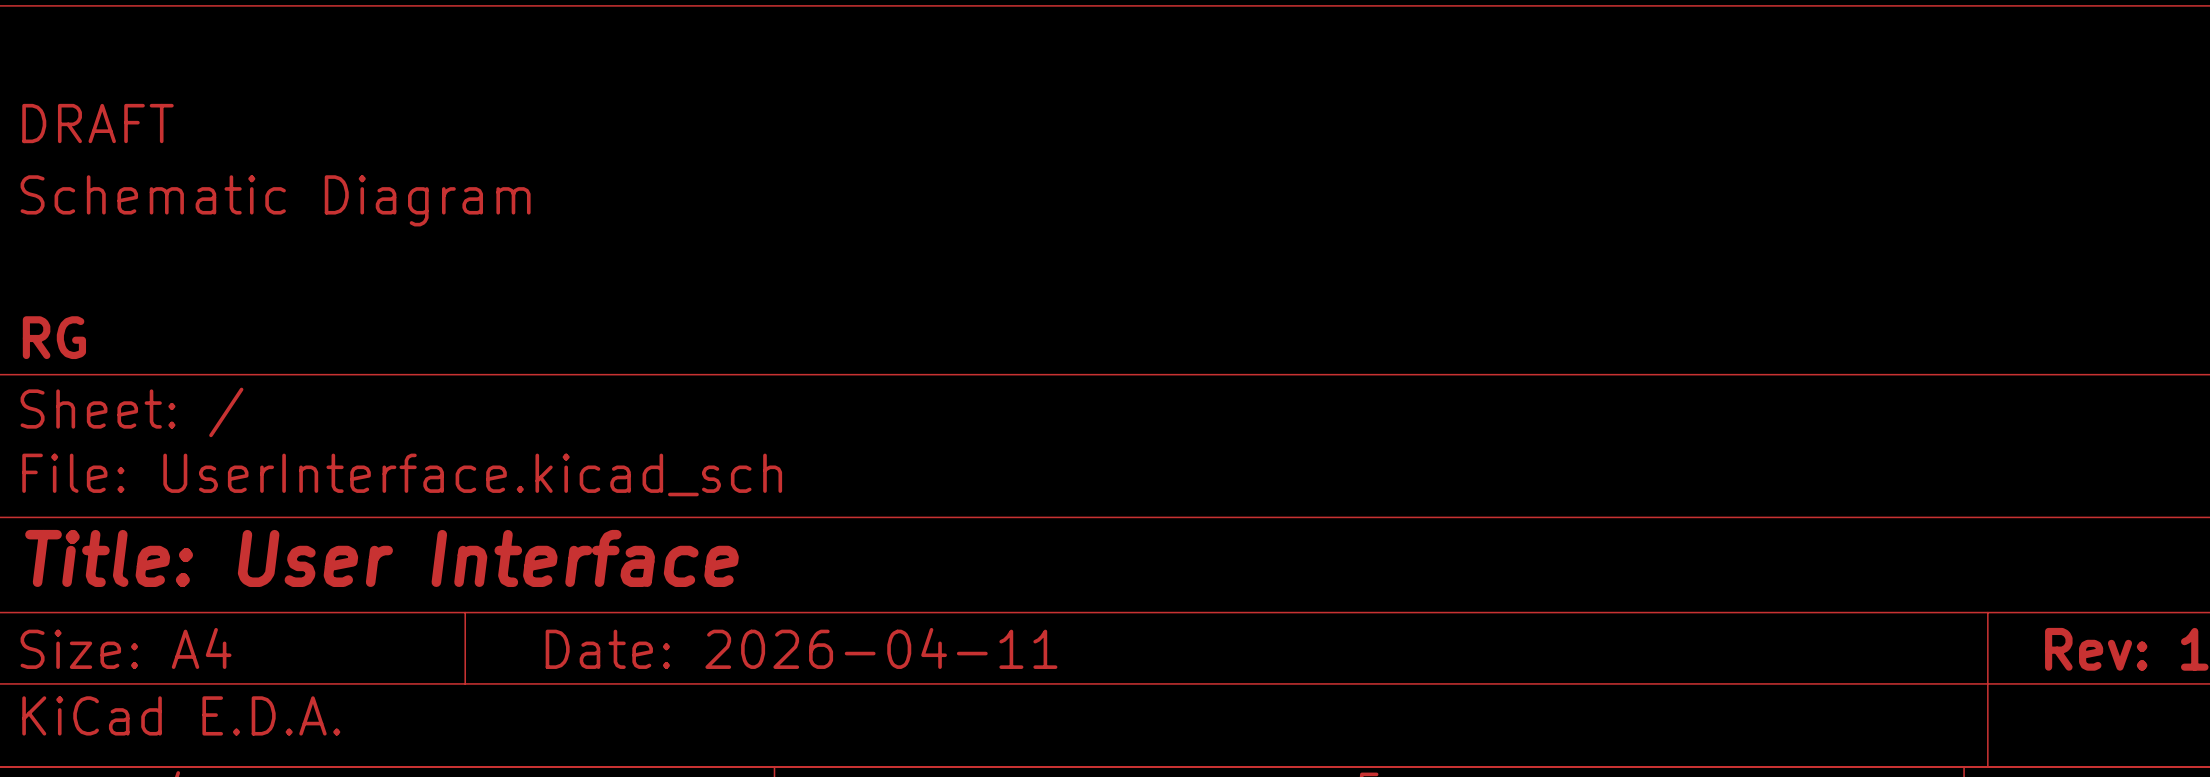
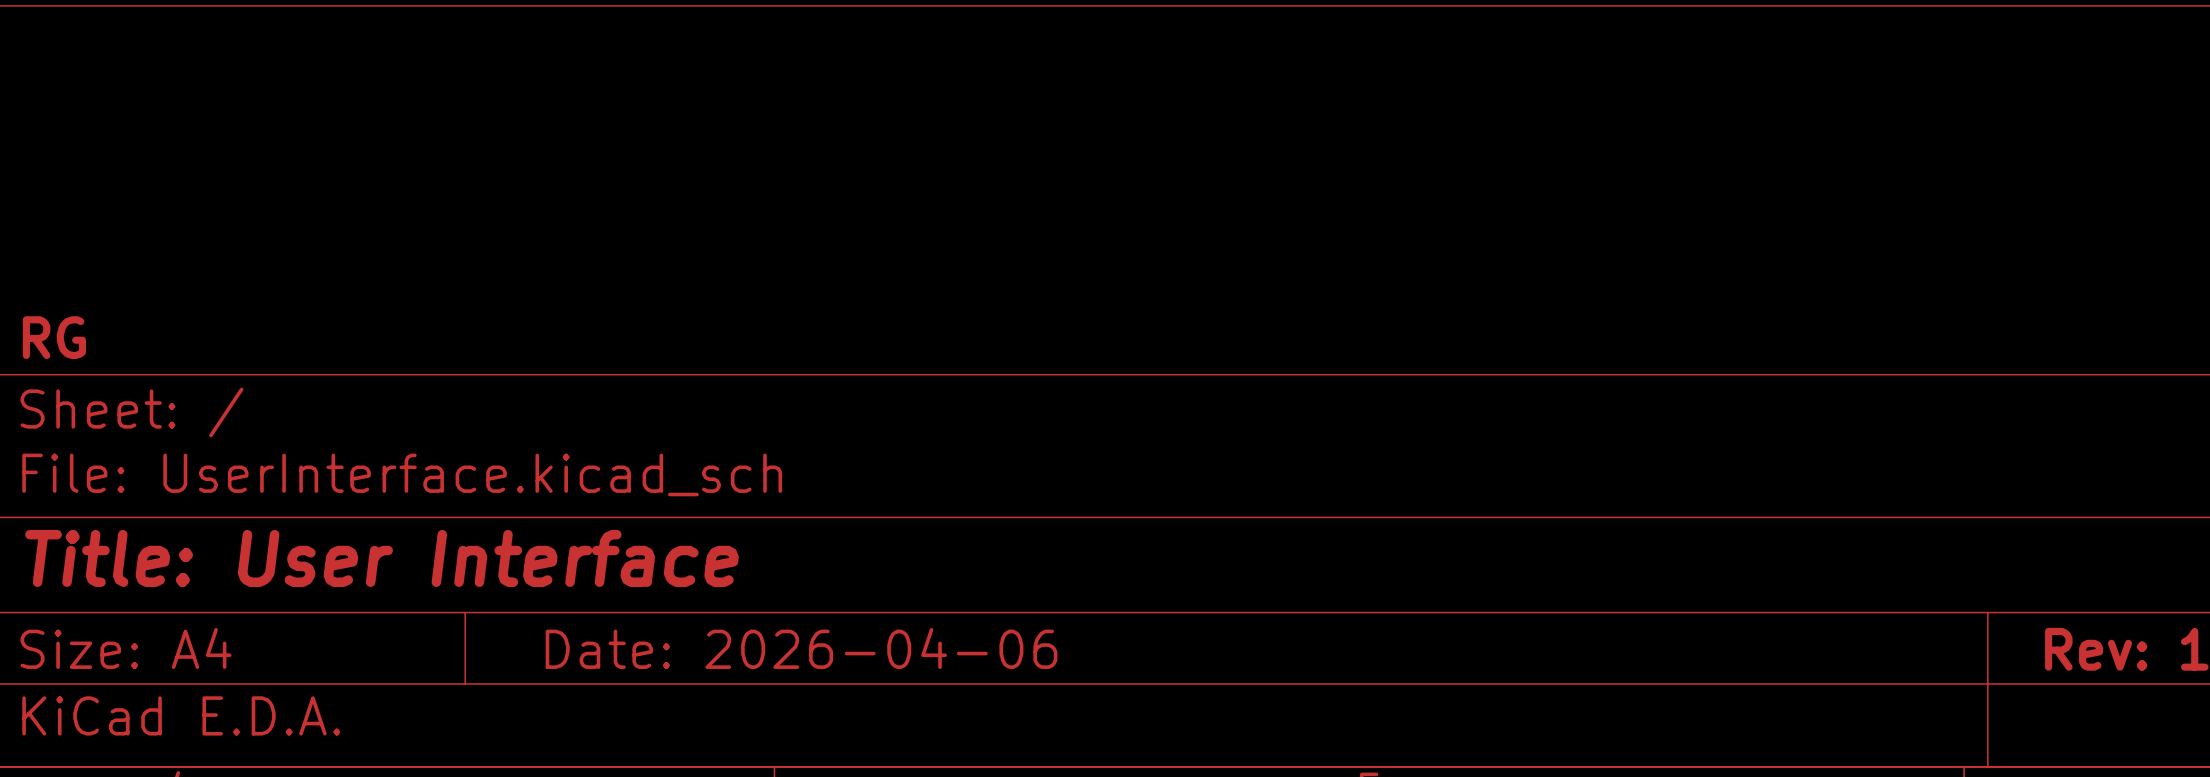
title block: DRAFT (97, 123) -> none
title block: Schematic Diagram (275, 200) -> none
title block: Date: 2026-04-11 (801, 648) -> Date: 2026-04-06 (801, 648)

